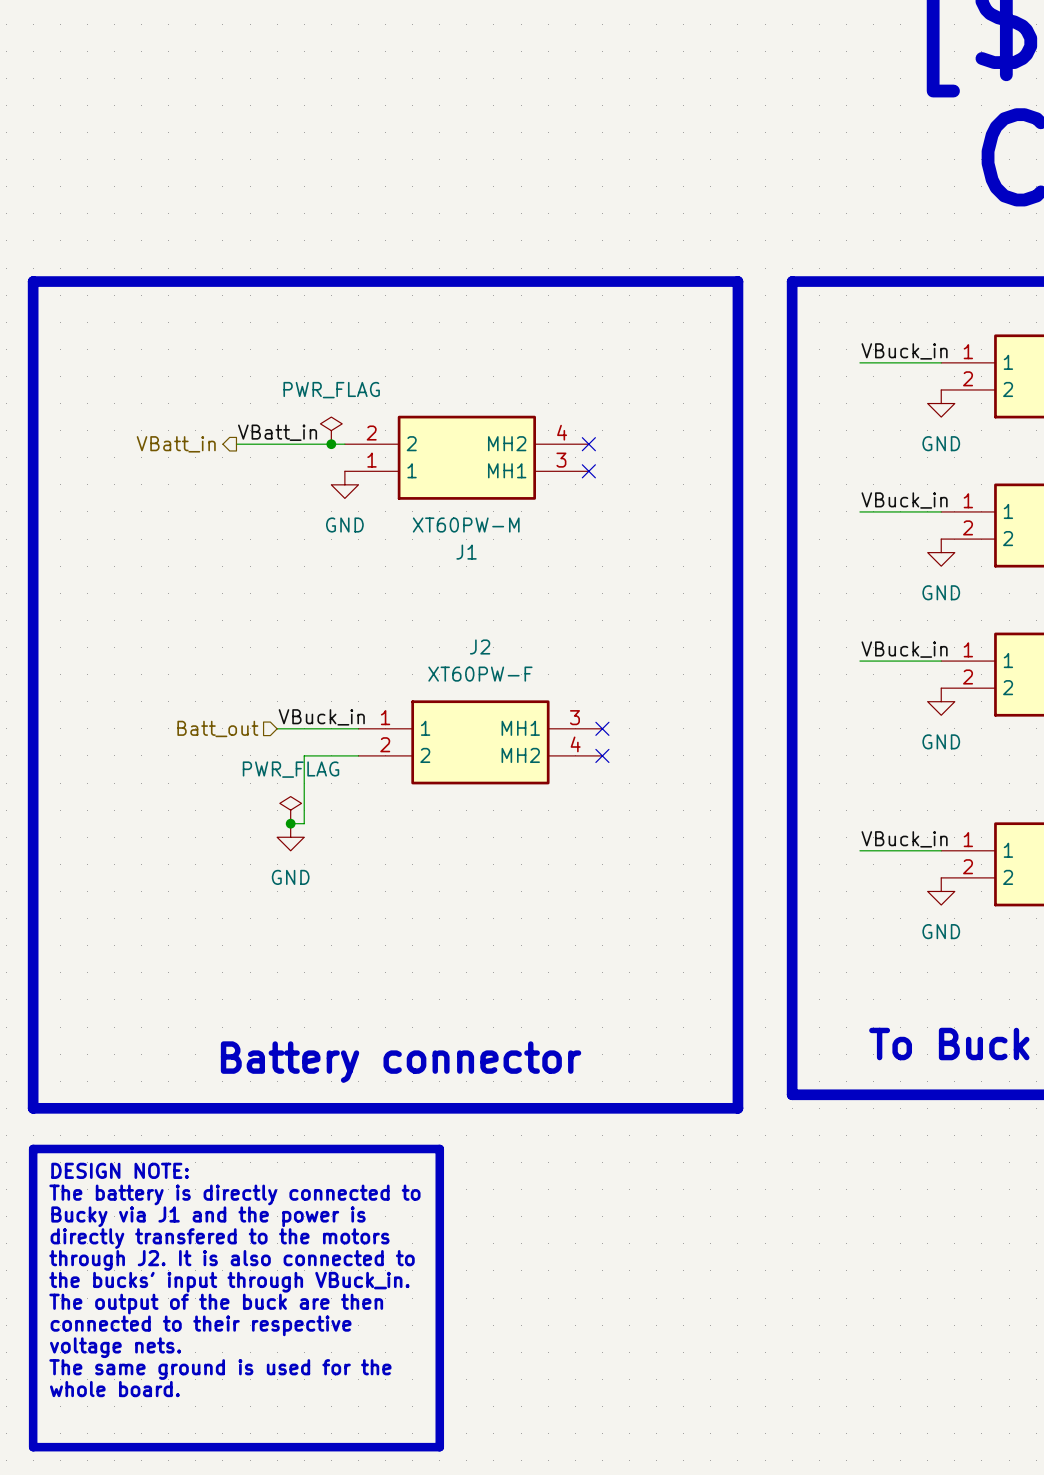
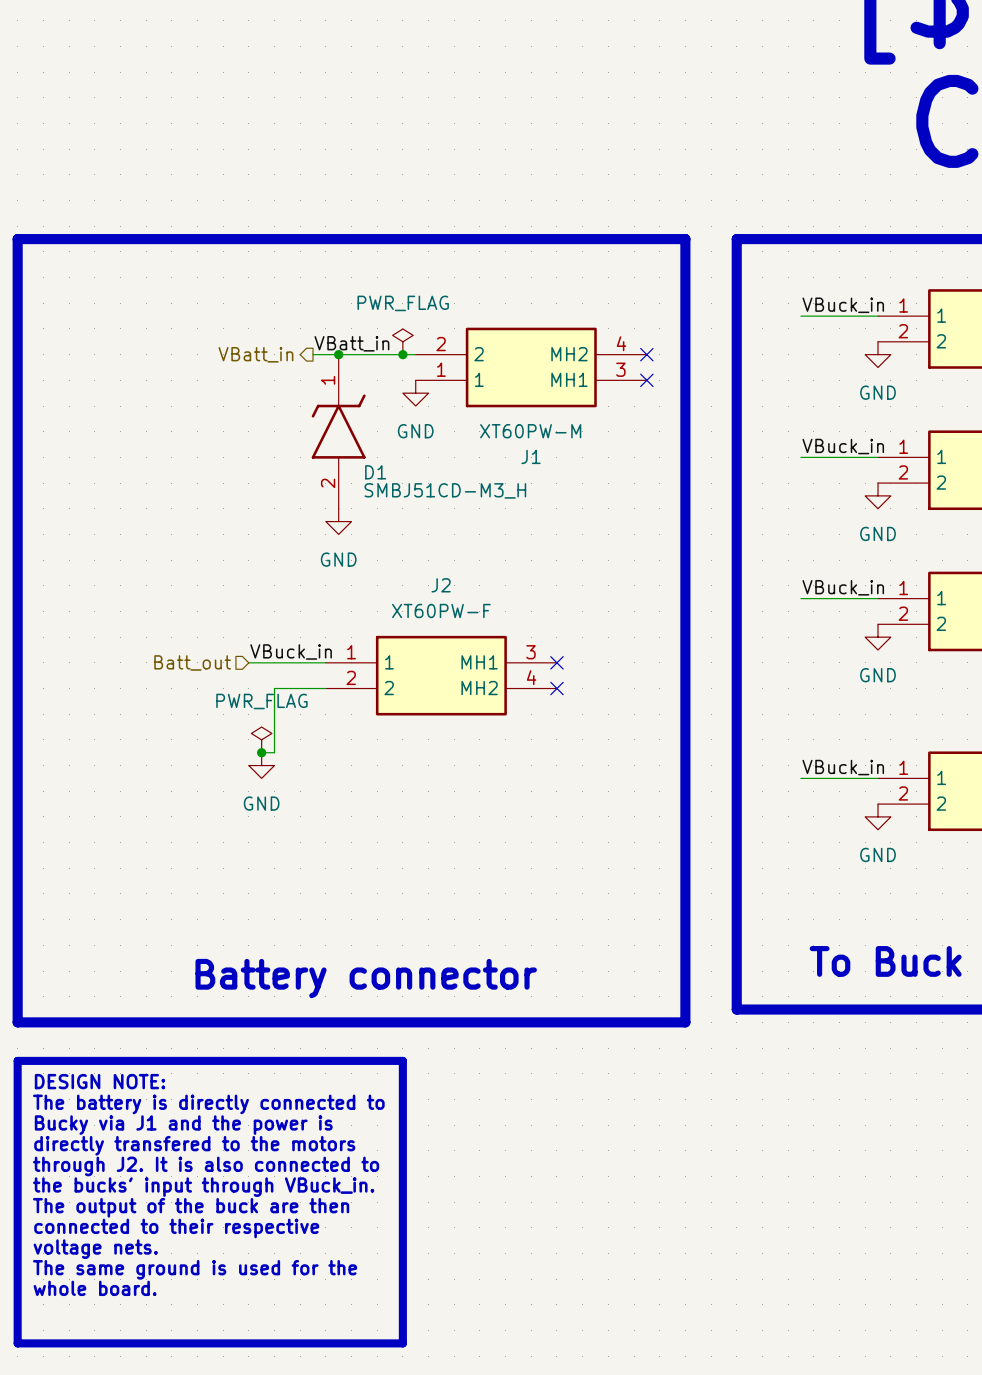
junction: none -> (402, 354)
no-connect mark: none -> (646, 354)
power symbol position: PWR_FLAG (331, 430) -> PWR_FLAG (402, 341)
no-connect mark: none -> (646, 380)
label position: VBatt_in (277, 432) -> VBatt_in (351, 343)
hierarchical label position: VBatt_in (176, 444) -> VBatt_in (255, 354)
wire: (236, 444) (344, 444) -> (313, 354) (415, 354)
junction position: (331, 444) -> (338, 354)
power symbol: none -> GND (415, 393)
no-connect mark: (588, 444) -> none
J1 position: (466, 457) -> (531, 367)
no-connect mark: (588, 471) -> none
power symbol: GND (344, 484) -> none
D1: none -> SMBJ51CD-M3_H (338, 431)
power symbol: none -> GND (338, 521)

